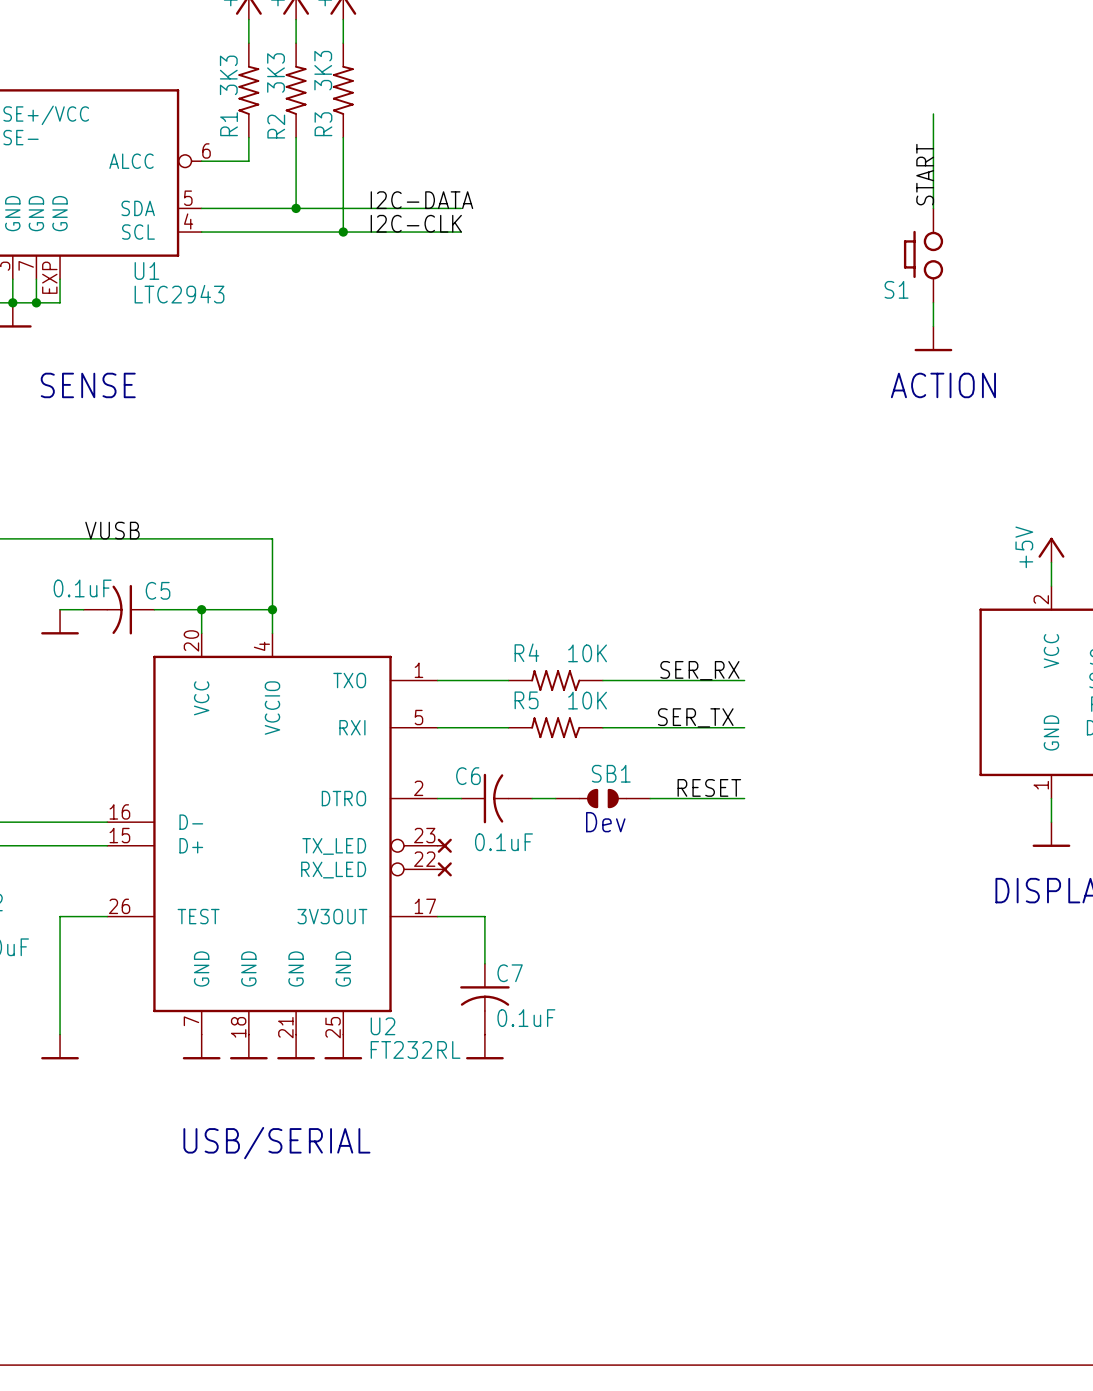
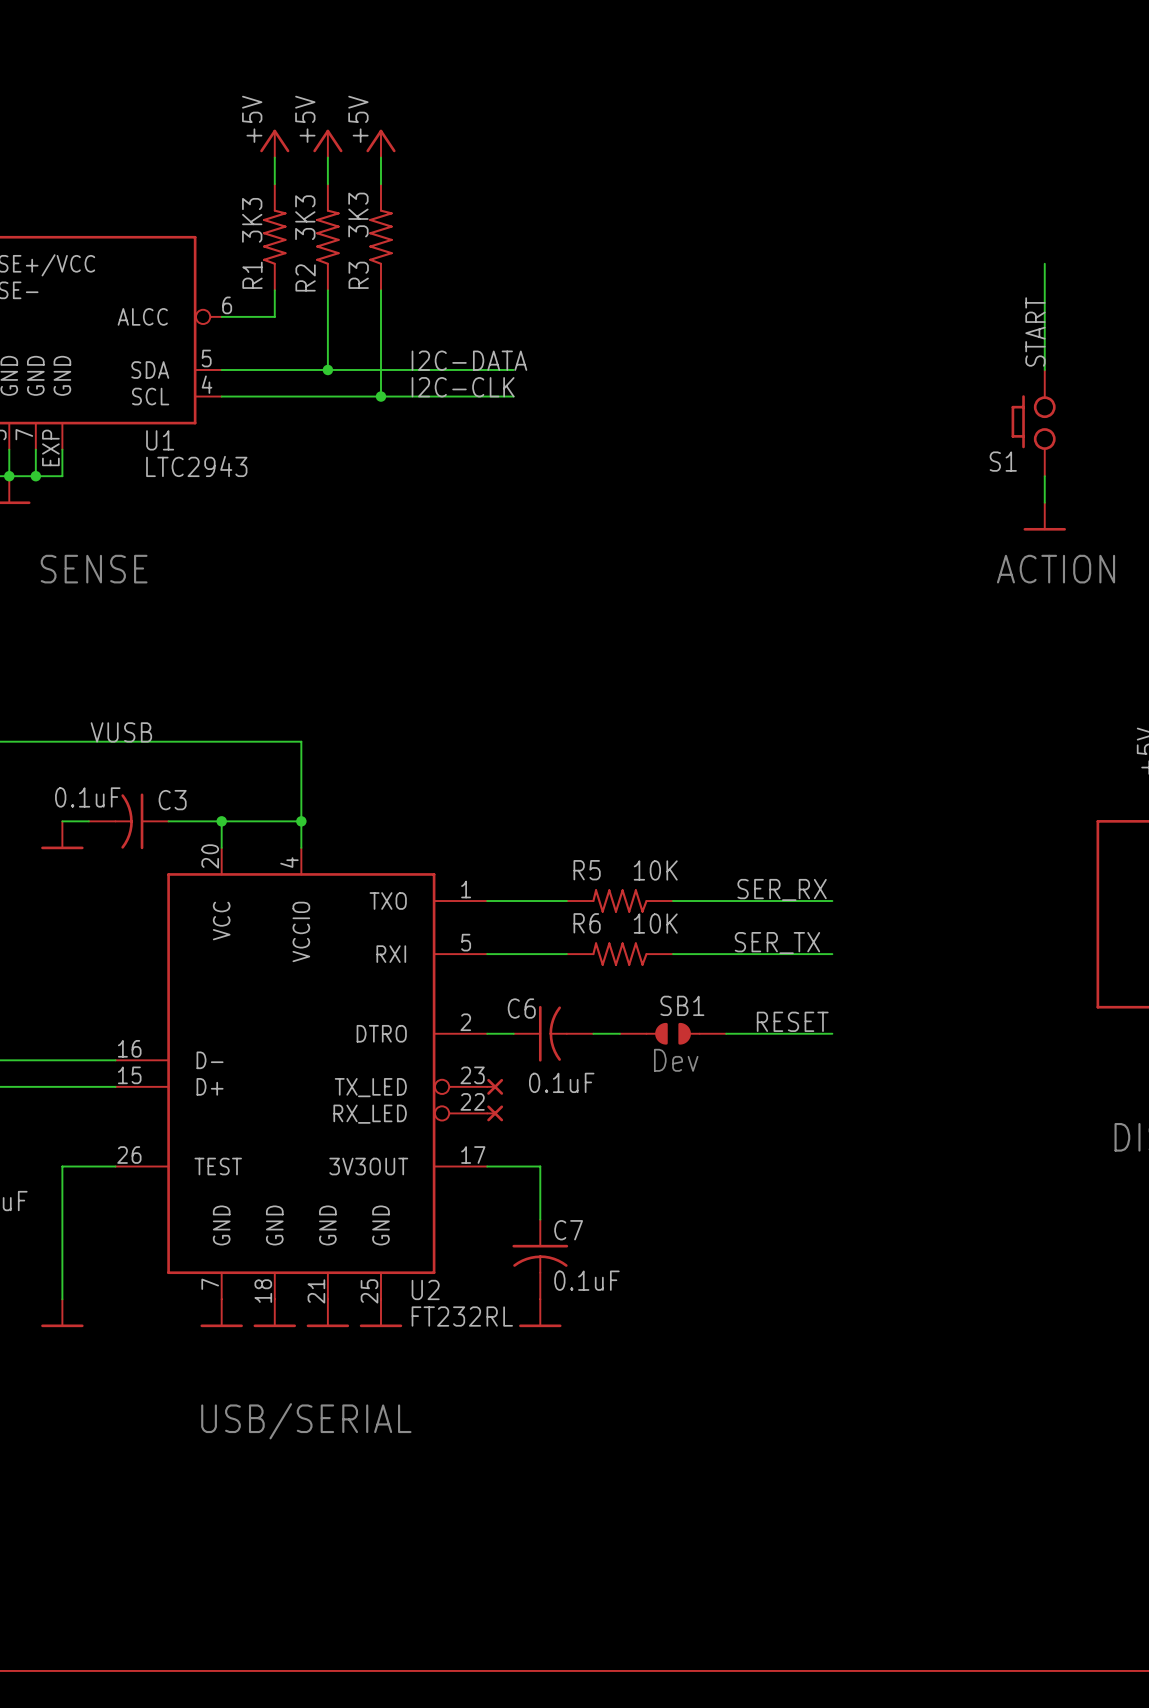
C5 name: C5 (158, 590) -> C3 (172, 800)
R4 name: R4 (526, 652) -> R5 (587, 870)
R5 name: R5 (526, 700) -> R6 (587, 923)

